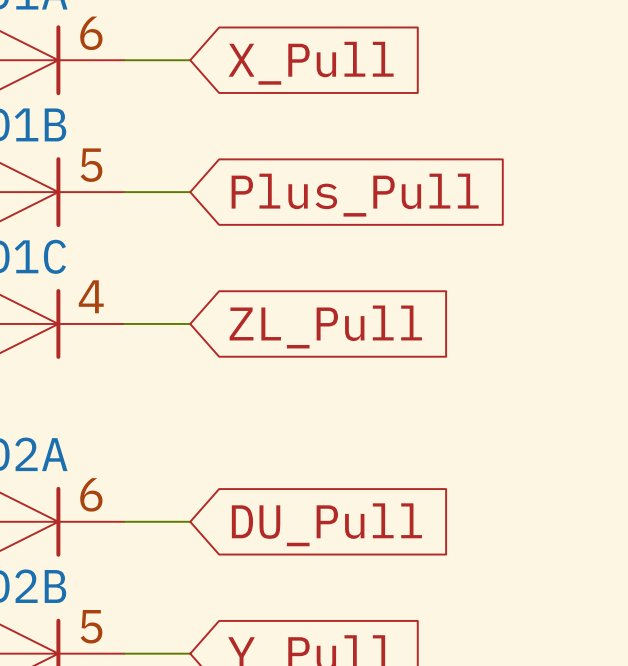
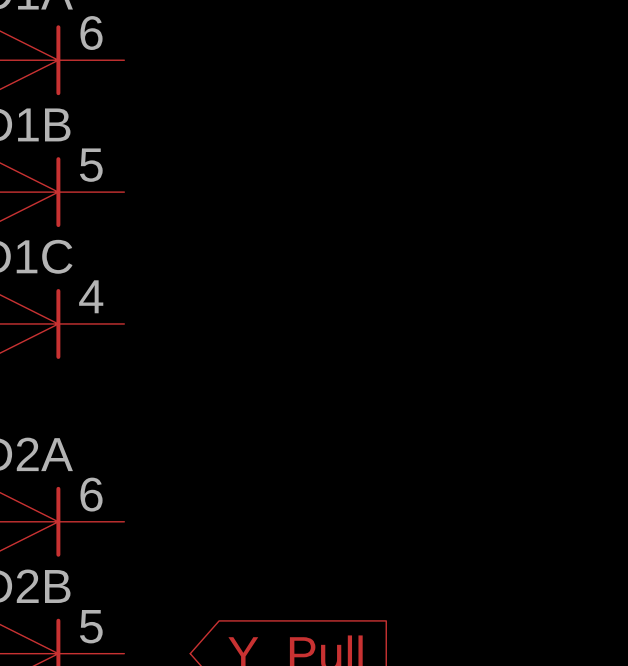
wire: (124, 60) (190, 60) -> none
global label: X_Pull (311, 63) -> none
wire: (124, 192) (190, 192) -> none
global label: Plus_Pull (355, 195) -> none
wire: (124, 323) (190, 323) -> none
global label: ZL_Pull (325, 326) -> none
wire: (124, 521) (190, 521) -> none
global label: DU_Pull (326, 524) -> none
wire: (124, 653) (190, 653) -> none

